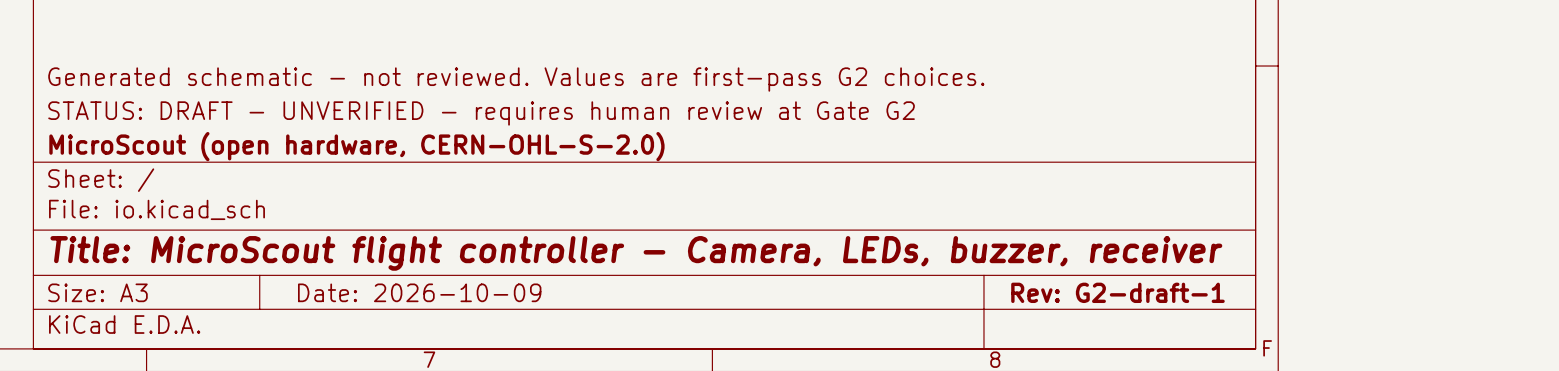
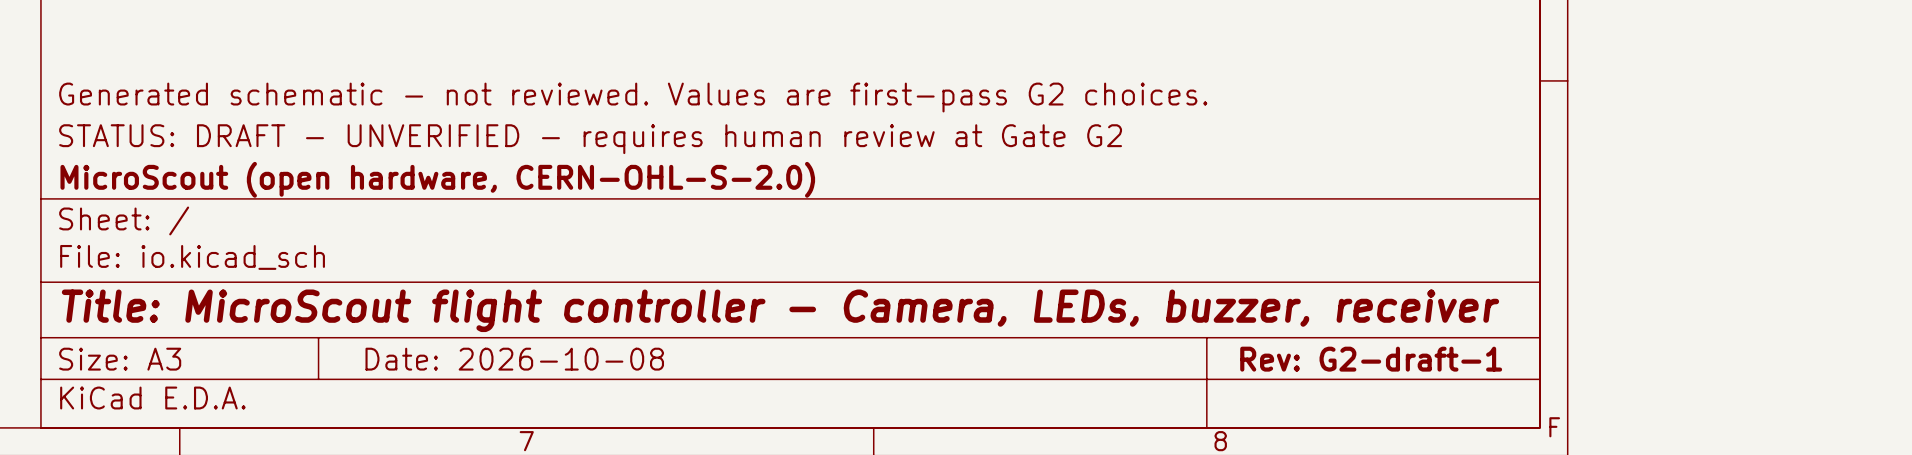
title block: Date: 2026-10-09 (419, 292) -> Date: 2026-10-08 (514, 359)

